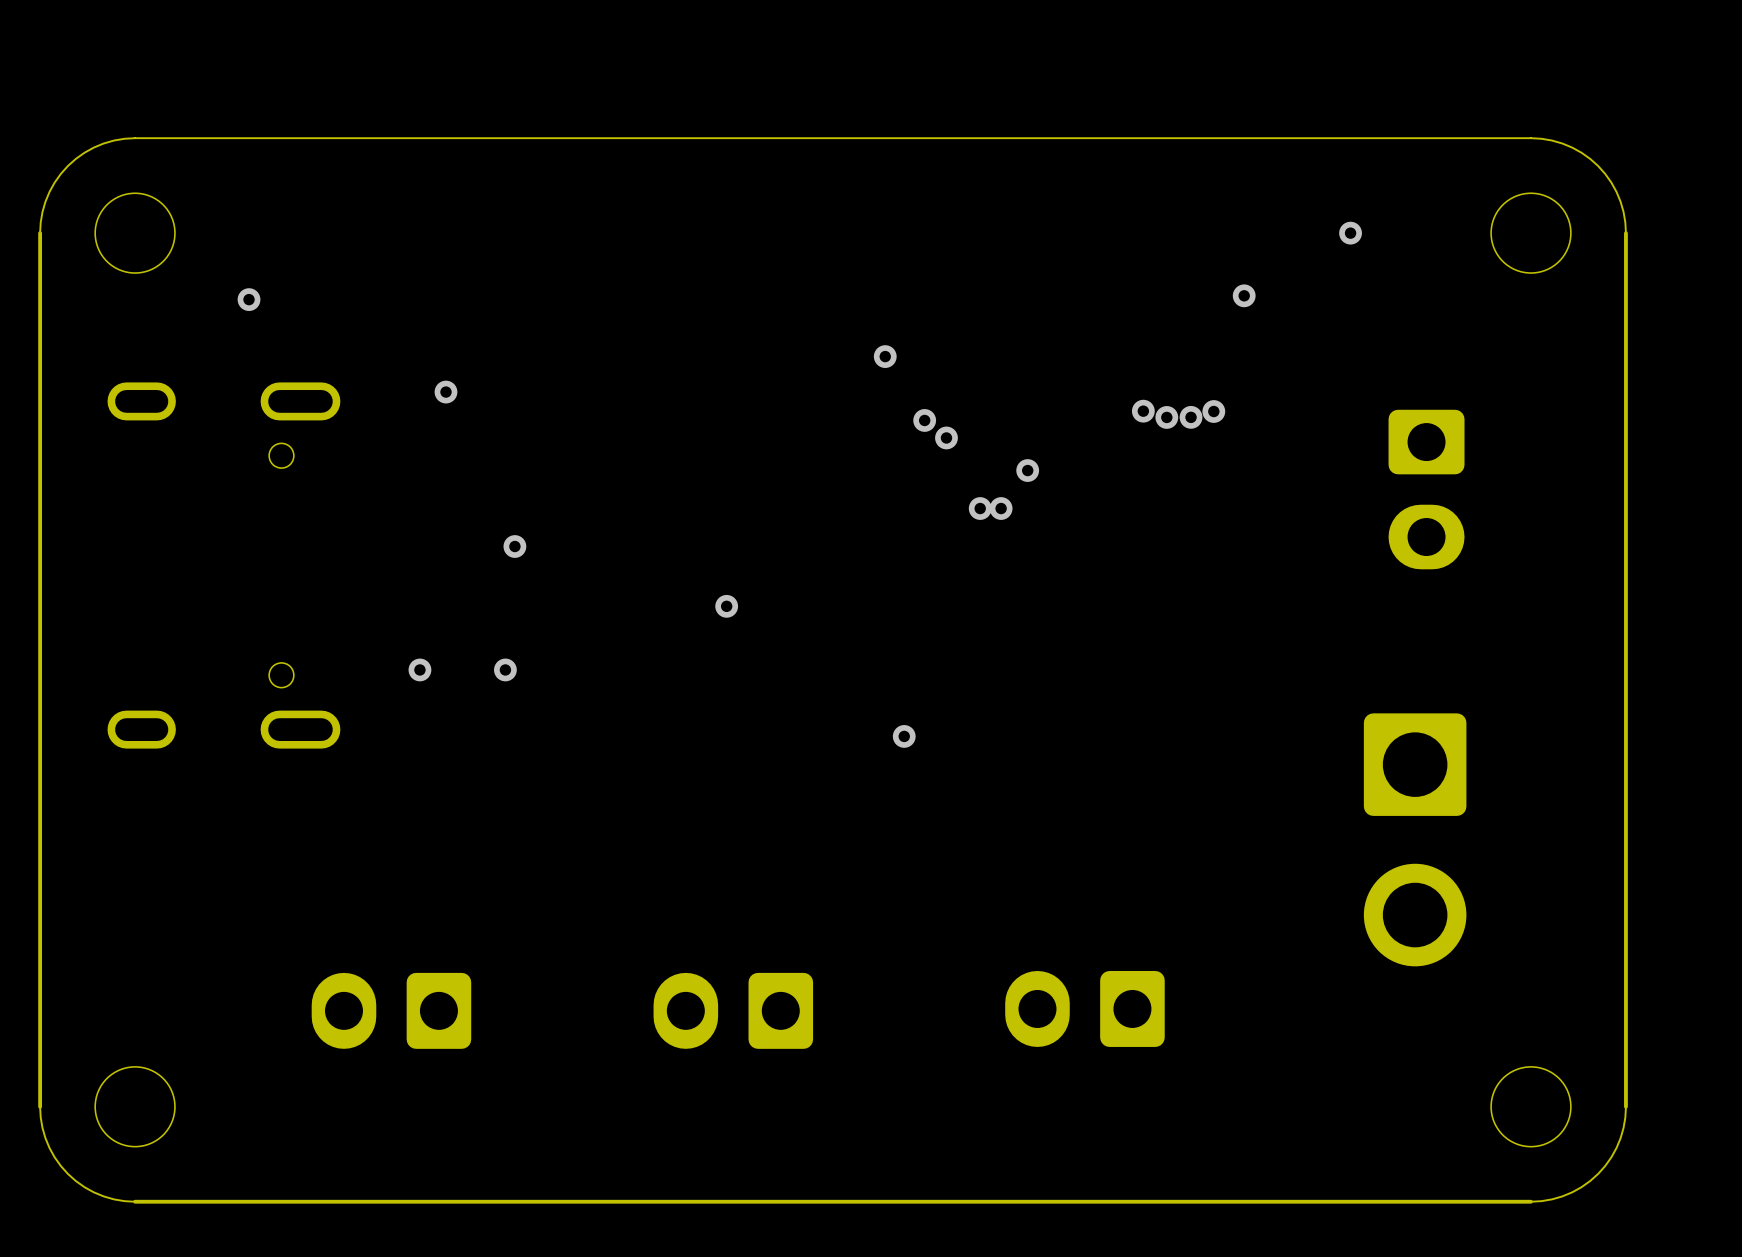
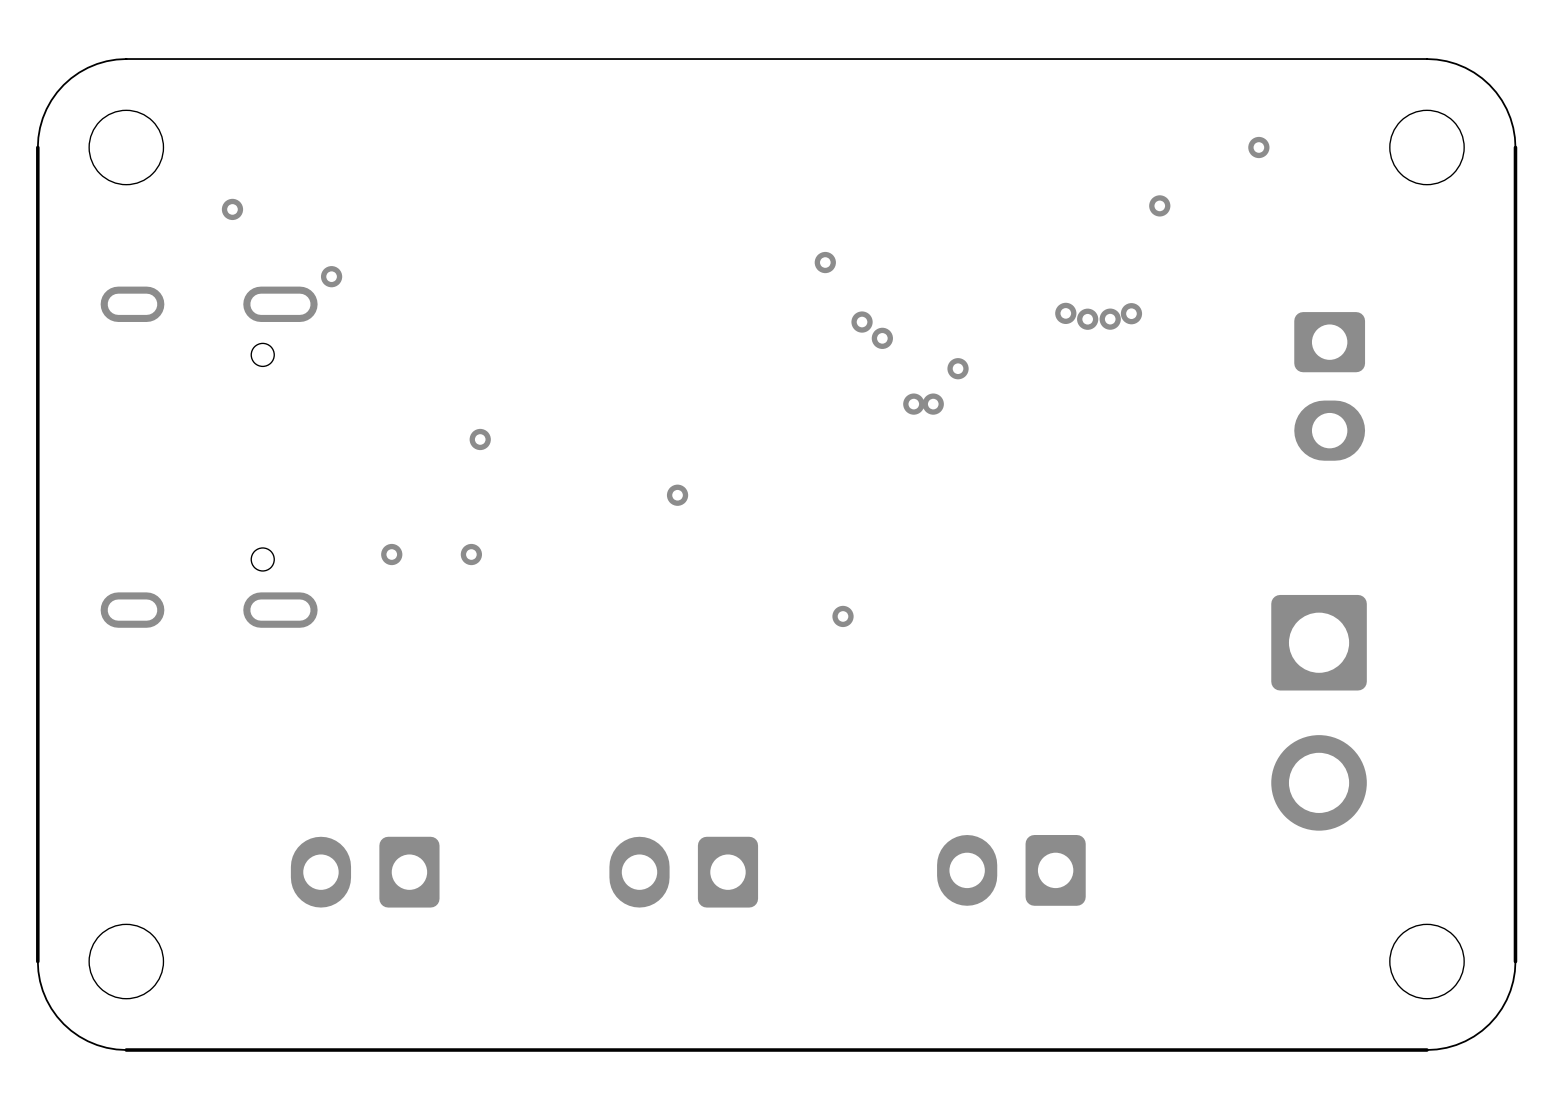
via position: (445, 392) -> (331, 276)

